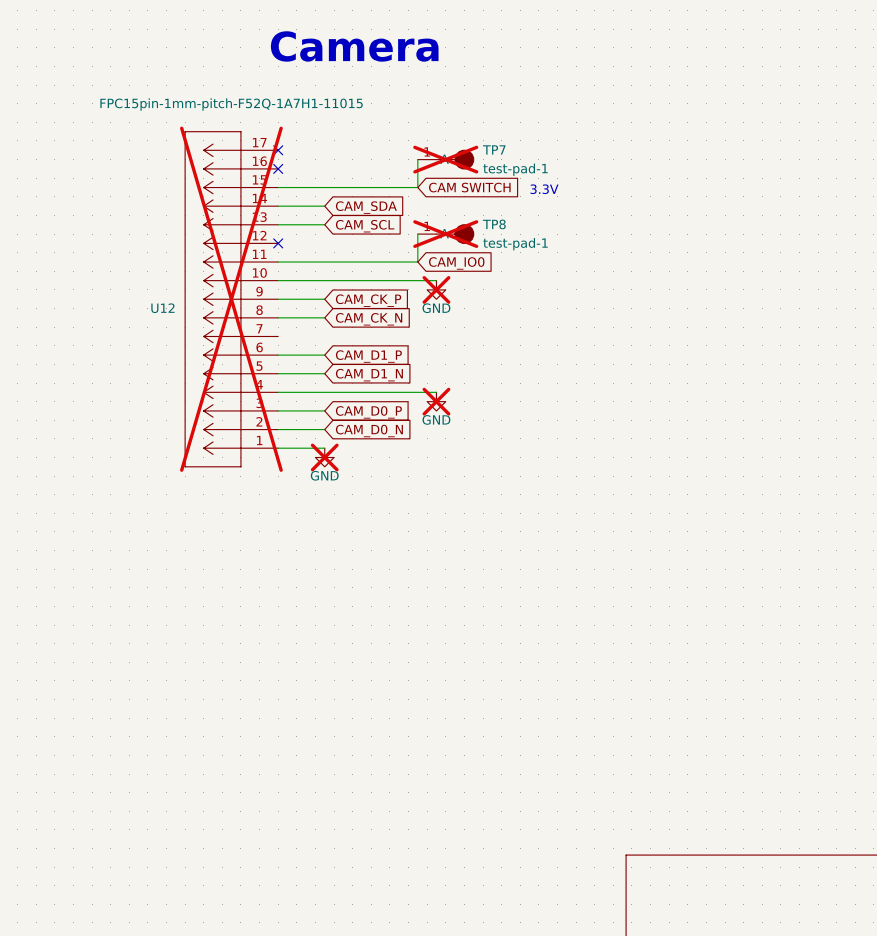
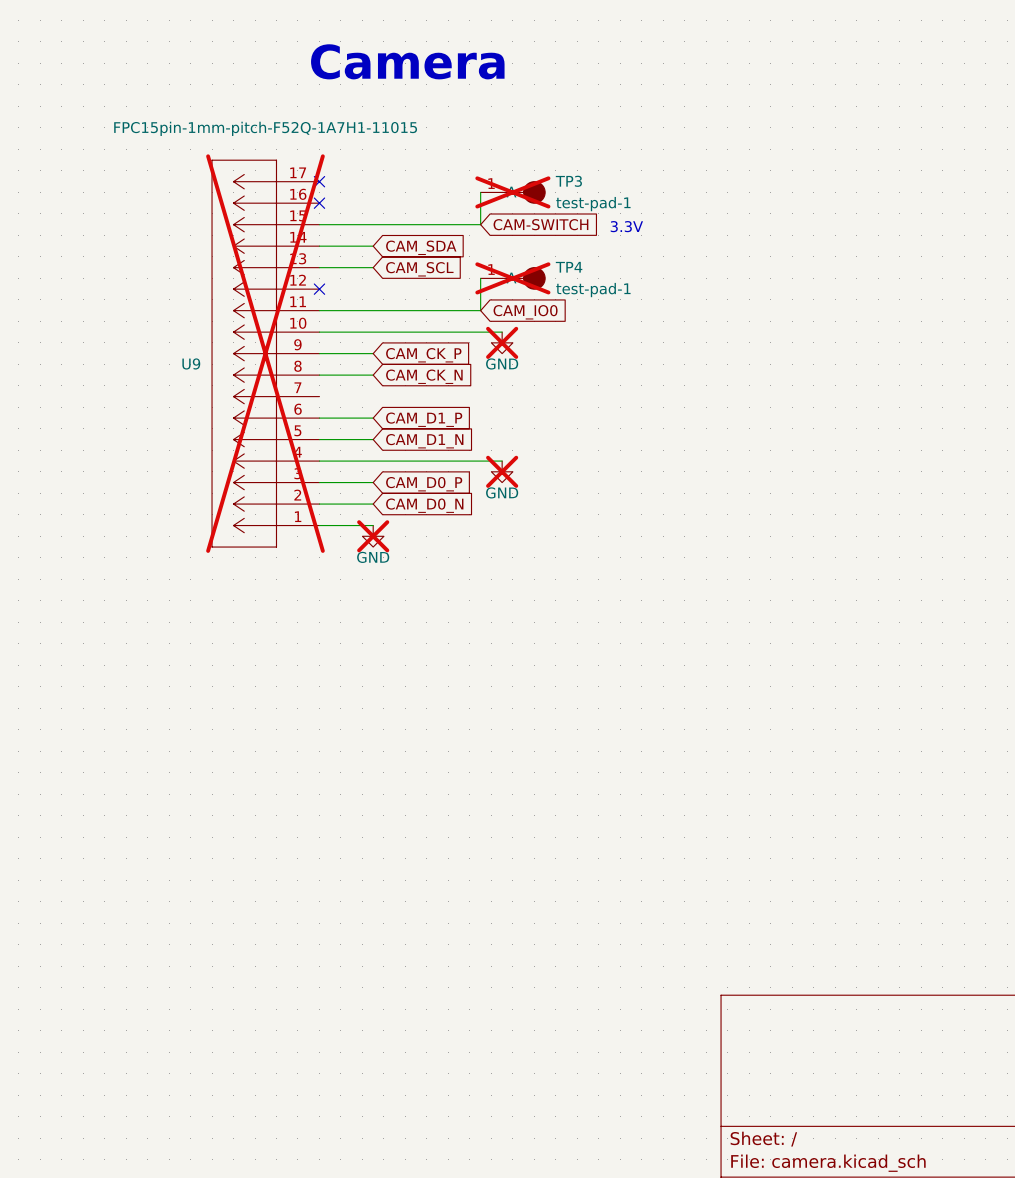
TP7 name: TP7 (494, 149) -> TP3 (568, 181)
global label: CAM SWITCH (469, 187) -> CAM-SWITCH (540, 224)
TP8 name: TP8 (494, 224) -> TP4 (569, 267)
U12 name: U12 (162, 308) -> U9 (191, 363)

